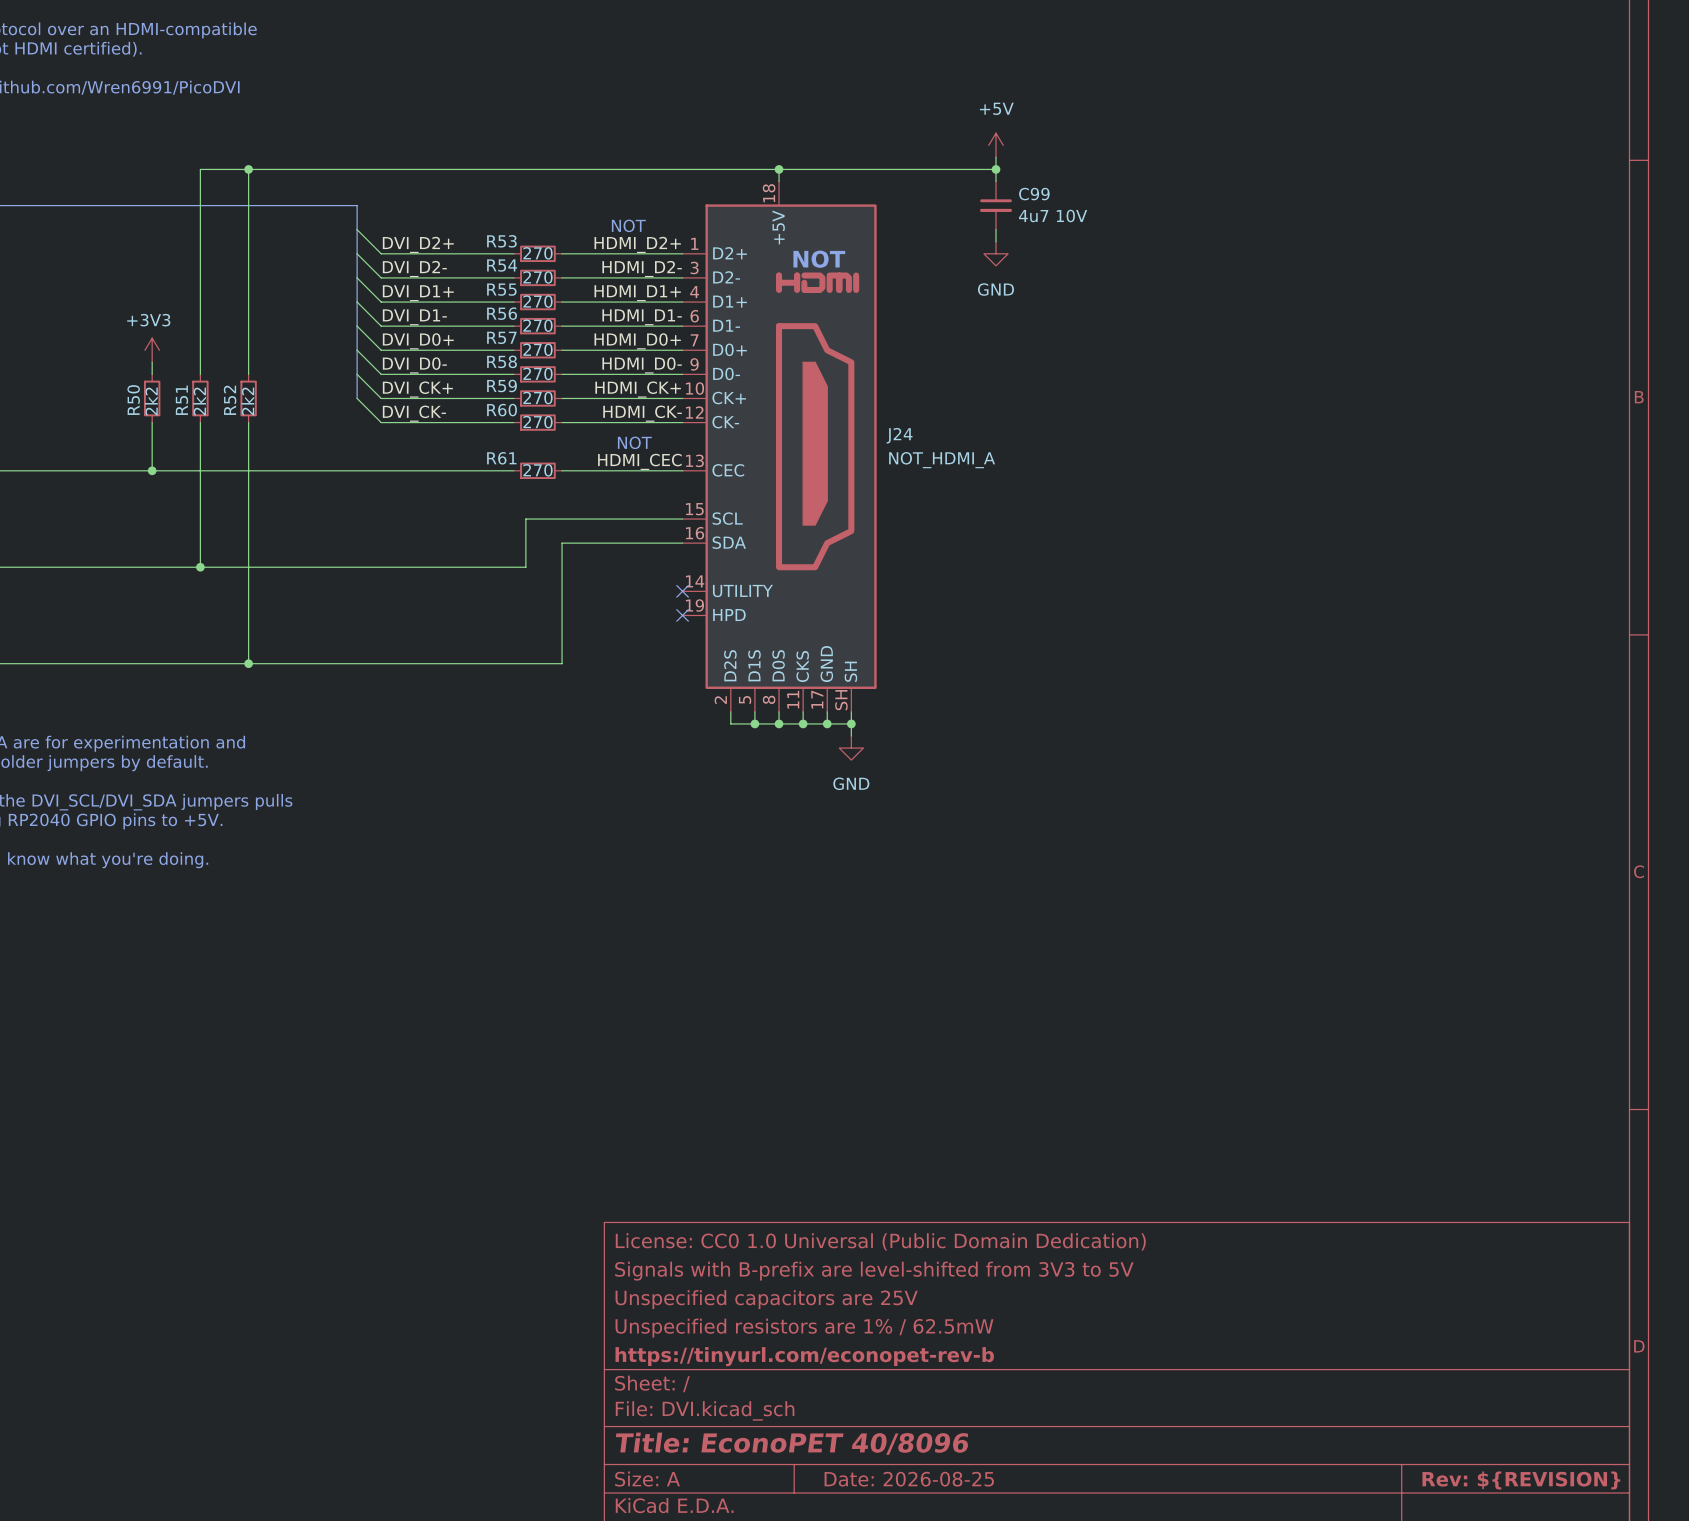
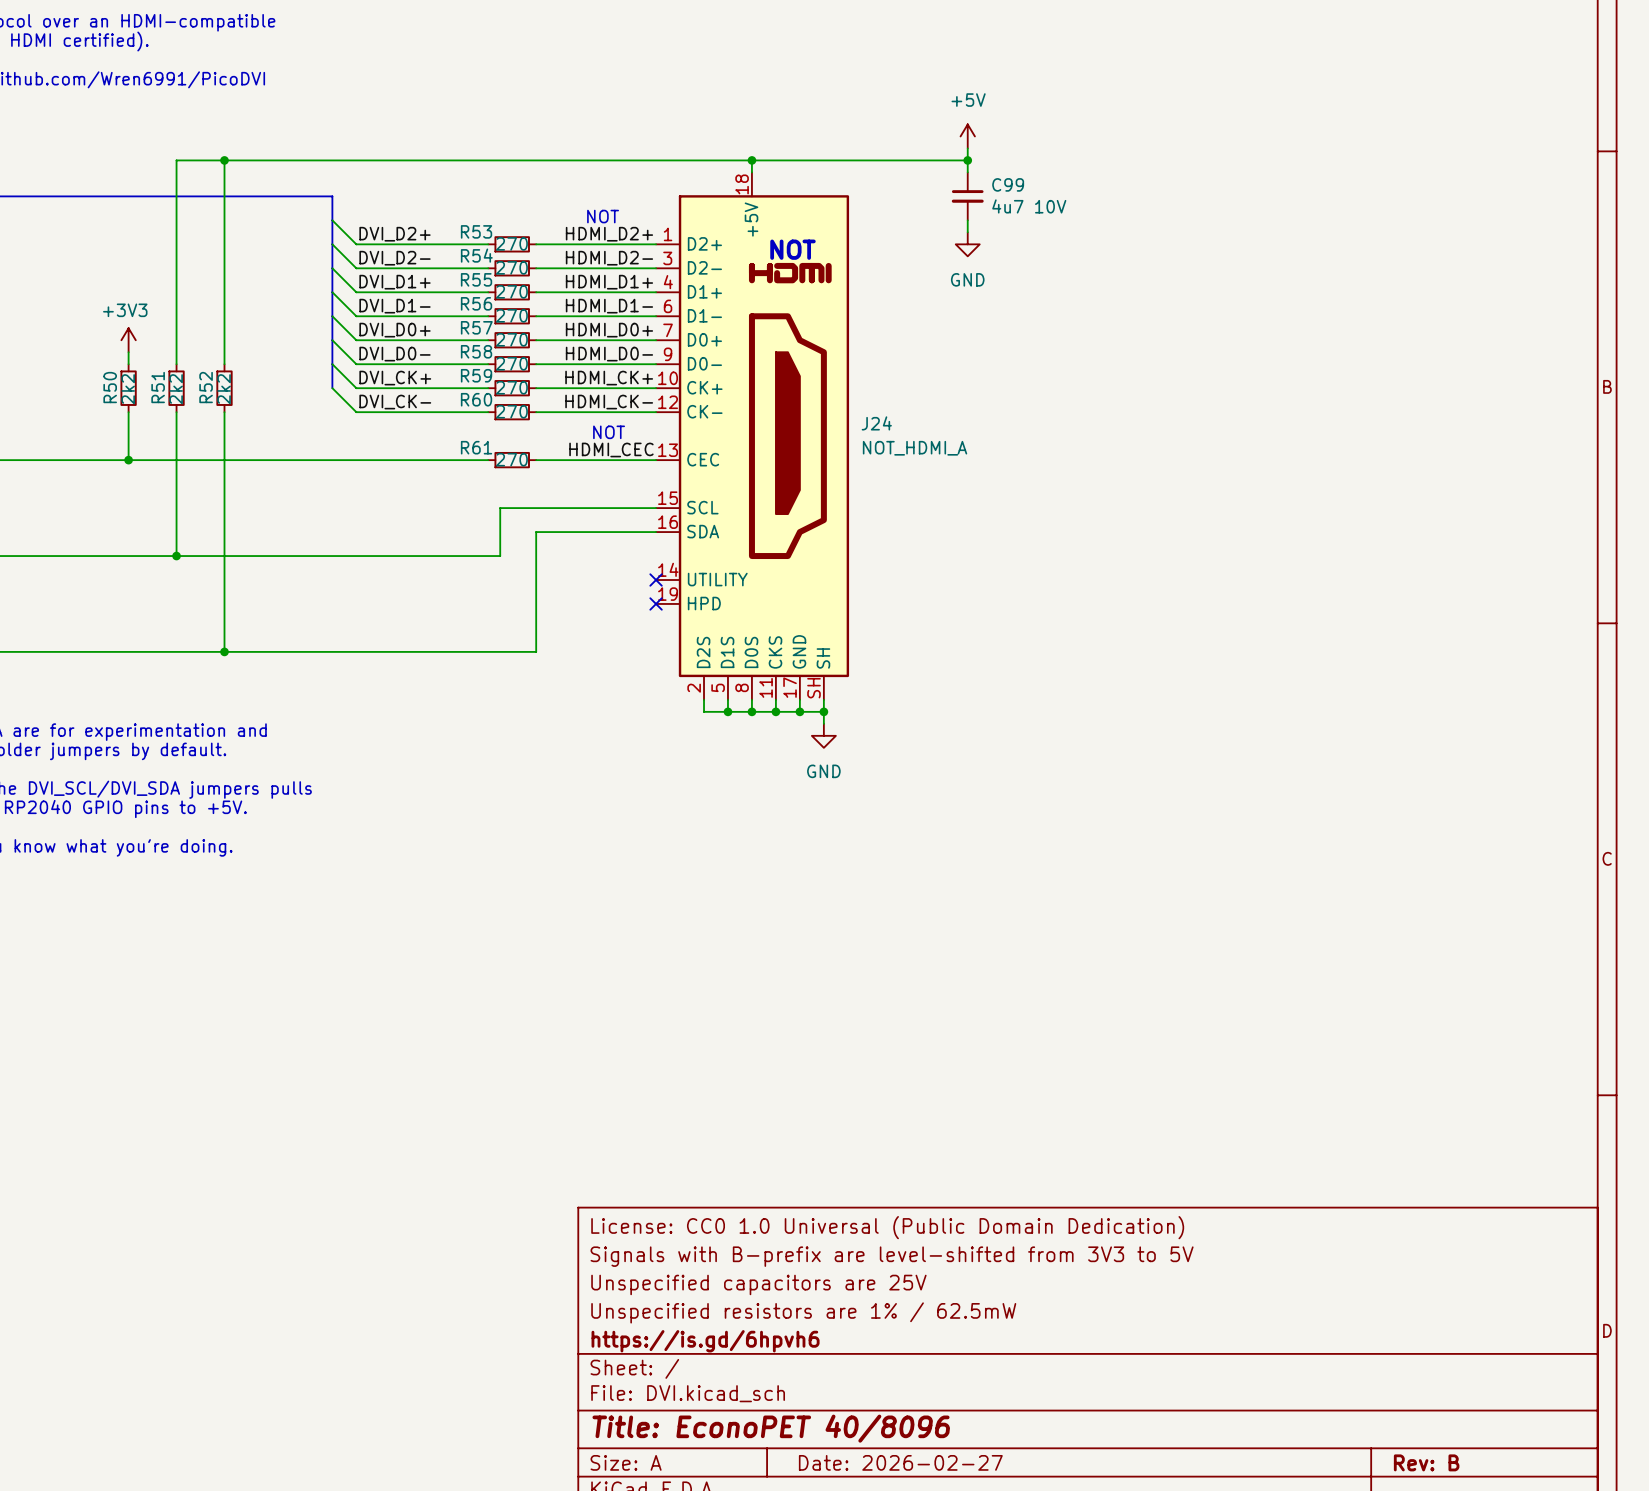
title block: https://tinyurl.com/econopet-rev-b (804, 1356) -> https://is.gd/6hpvh6 (705, 1341)
title block: Date: 2026-08-25 (909, 1479) -> Date: 2026-02-27 (900, 1462)
title block: Rev: ${REVISION} (1521, 1480) -> Rev: B (1426, 1462)

